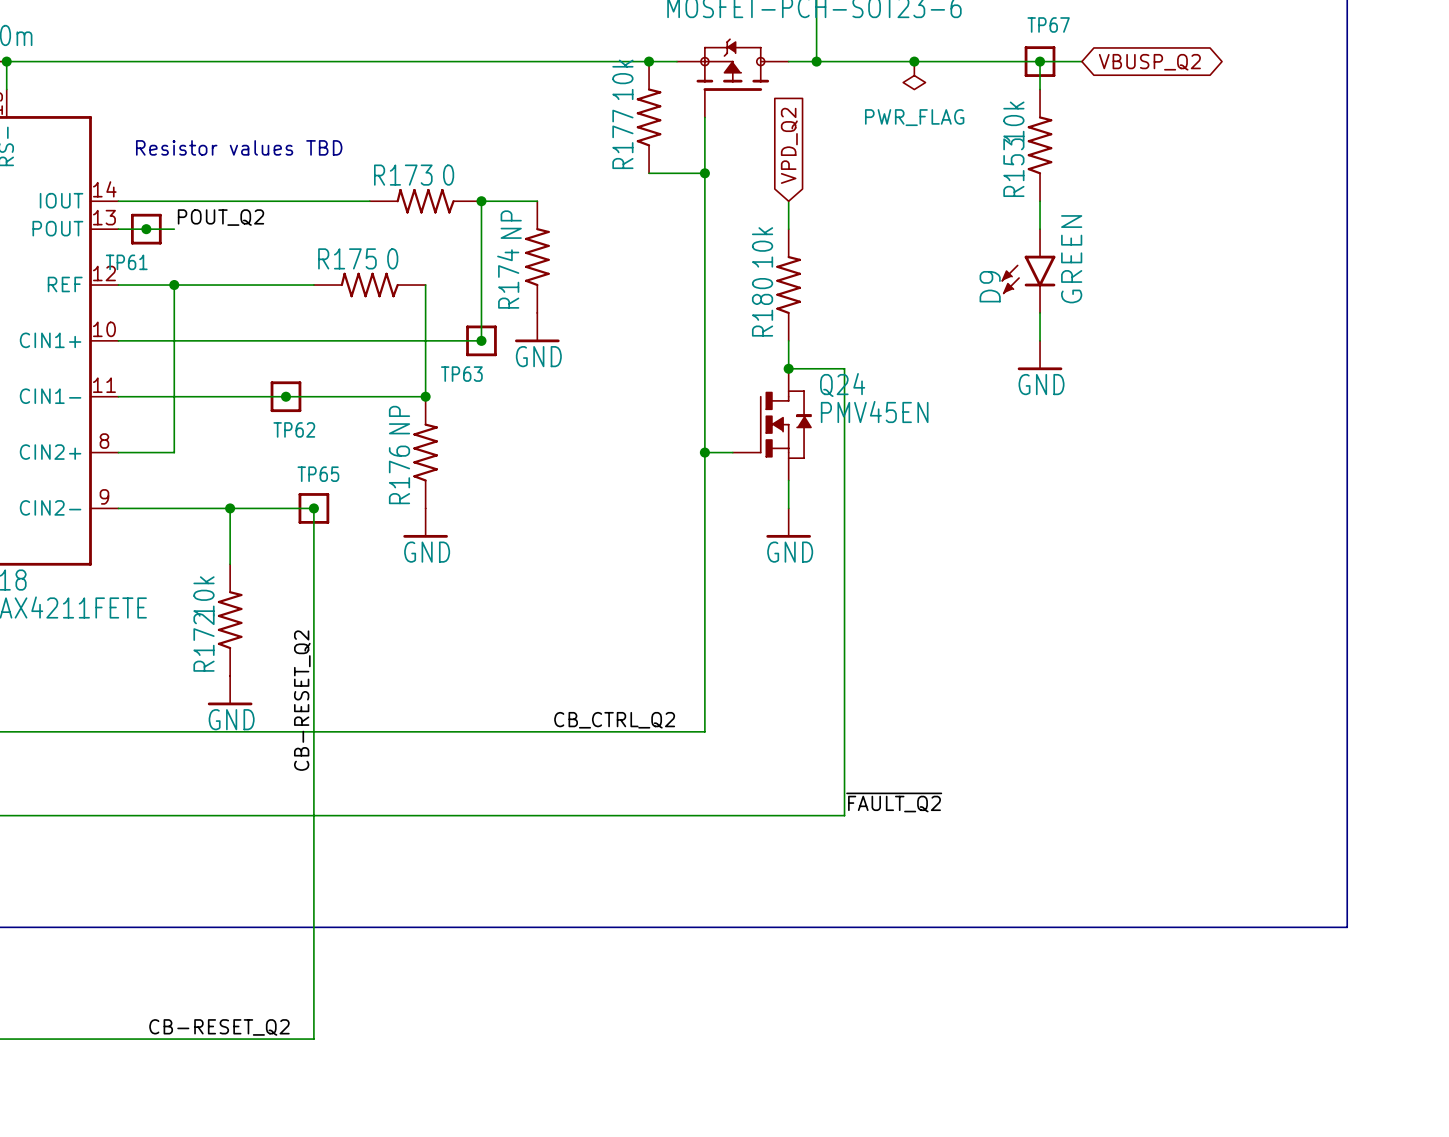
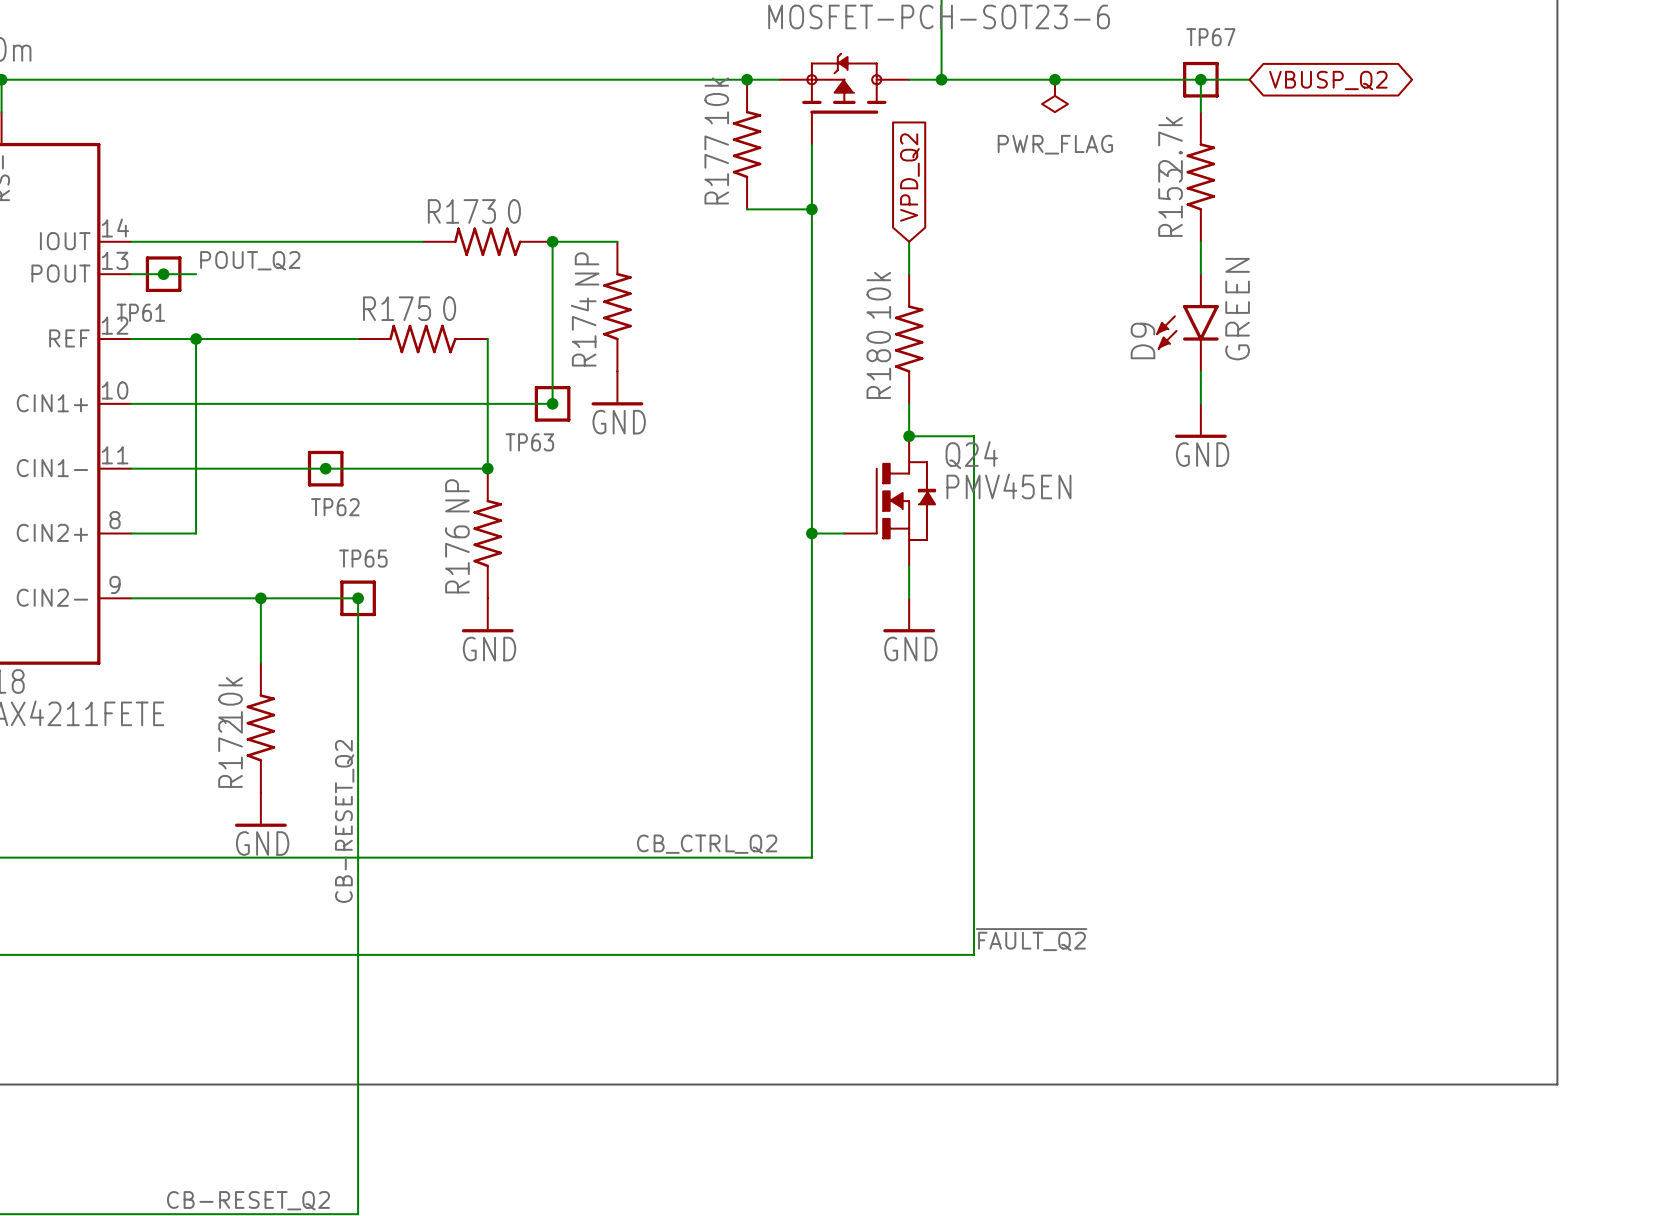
R153 value: 10k (1013, 121) -> 2.7k (1170, 145)
text: Resistor values TBD (239, 147) -> none

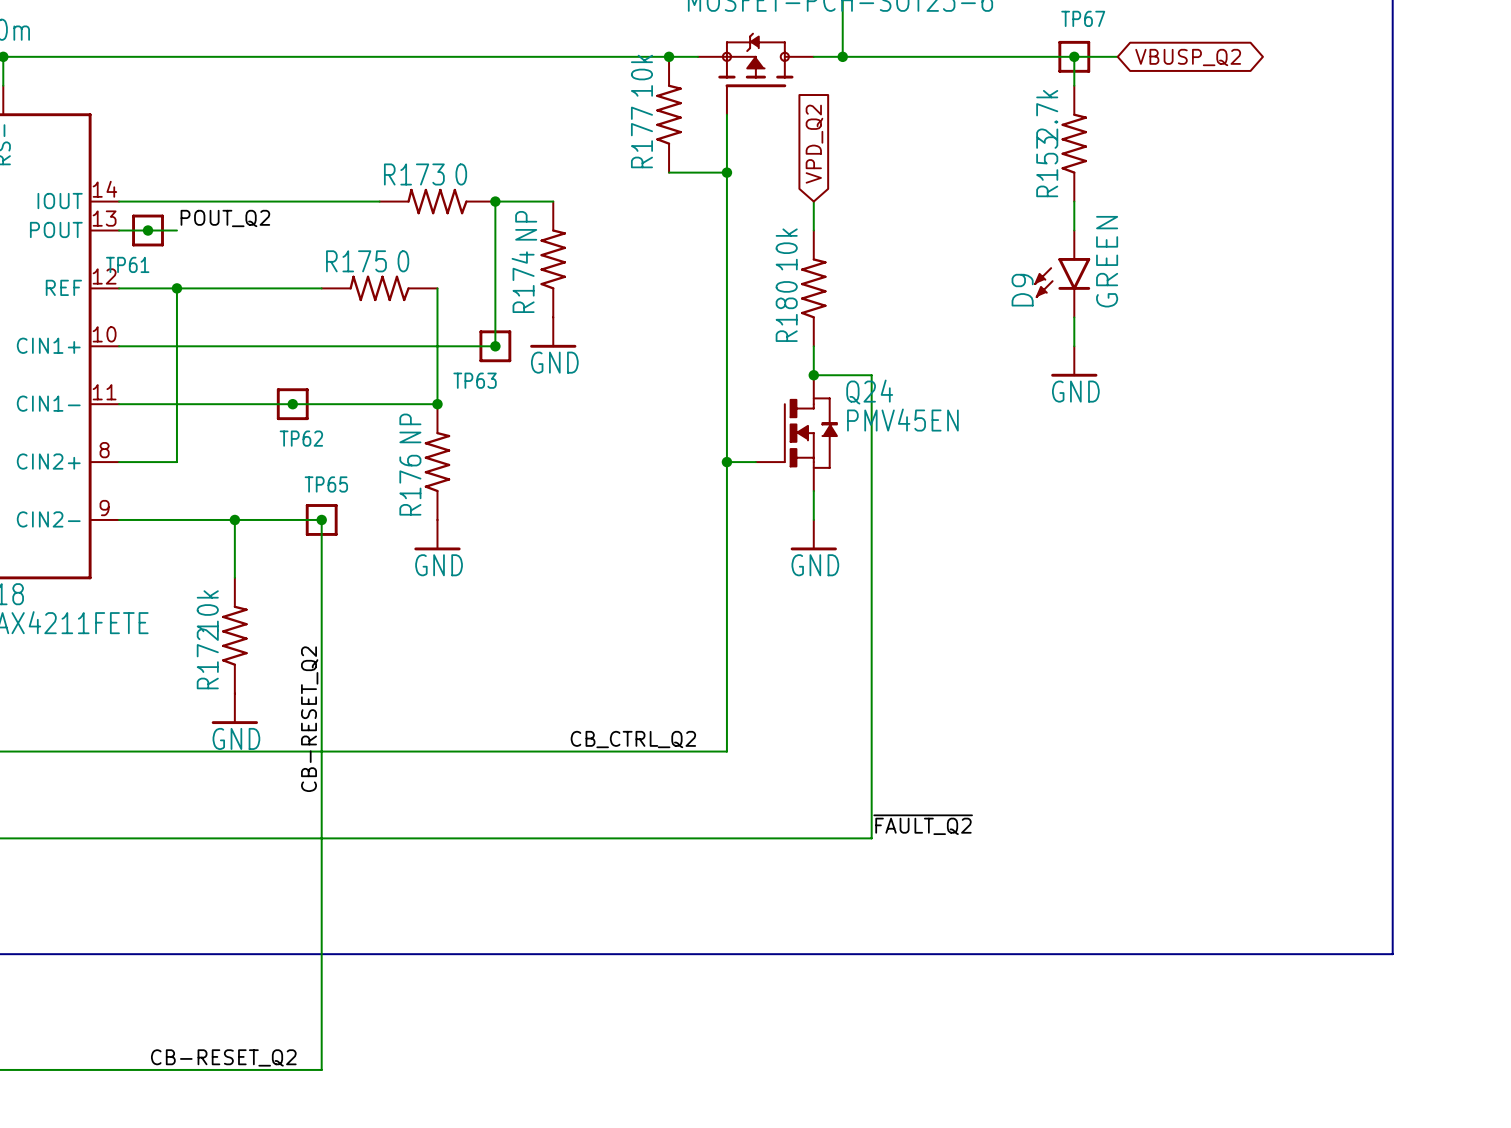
junction: (1055, 79) -> none
power symbol: PWR_FLAG (1055, 95) -> none

